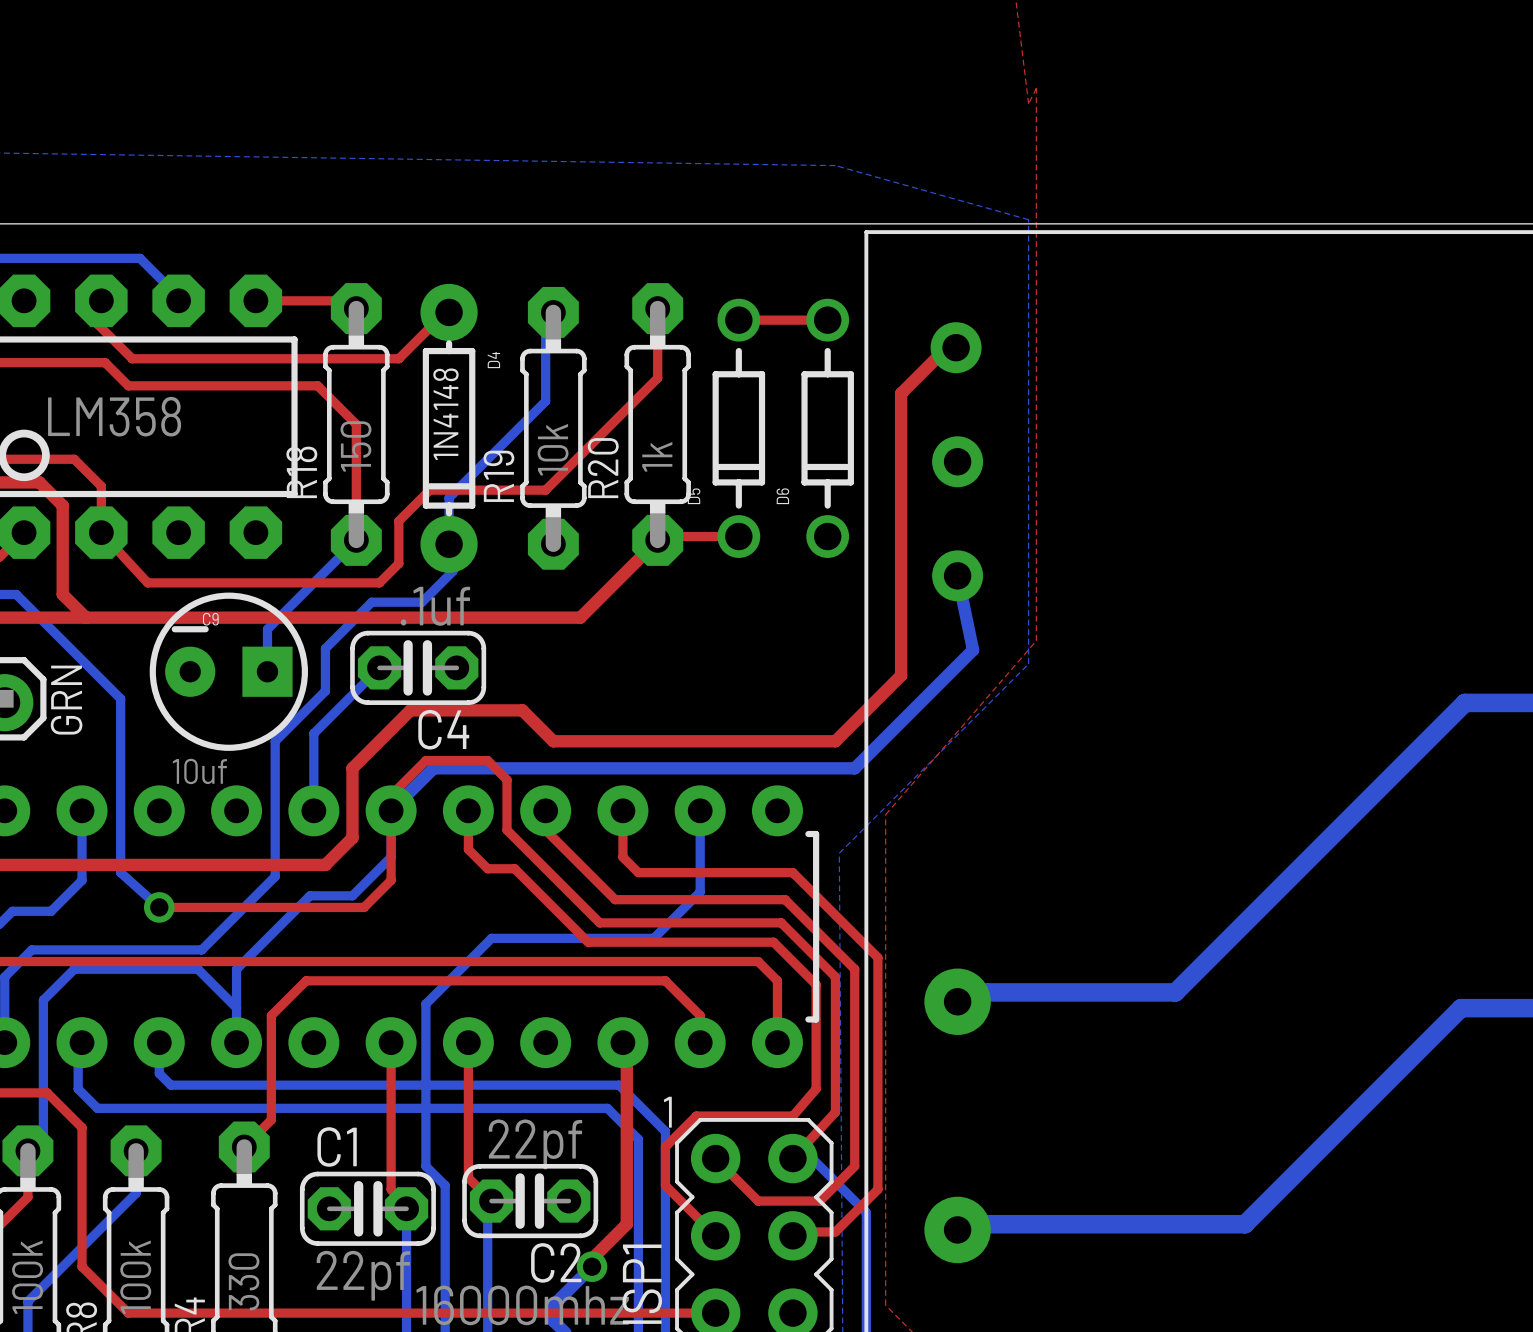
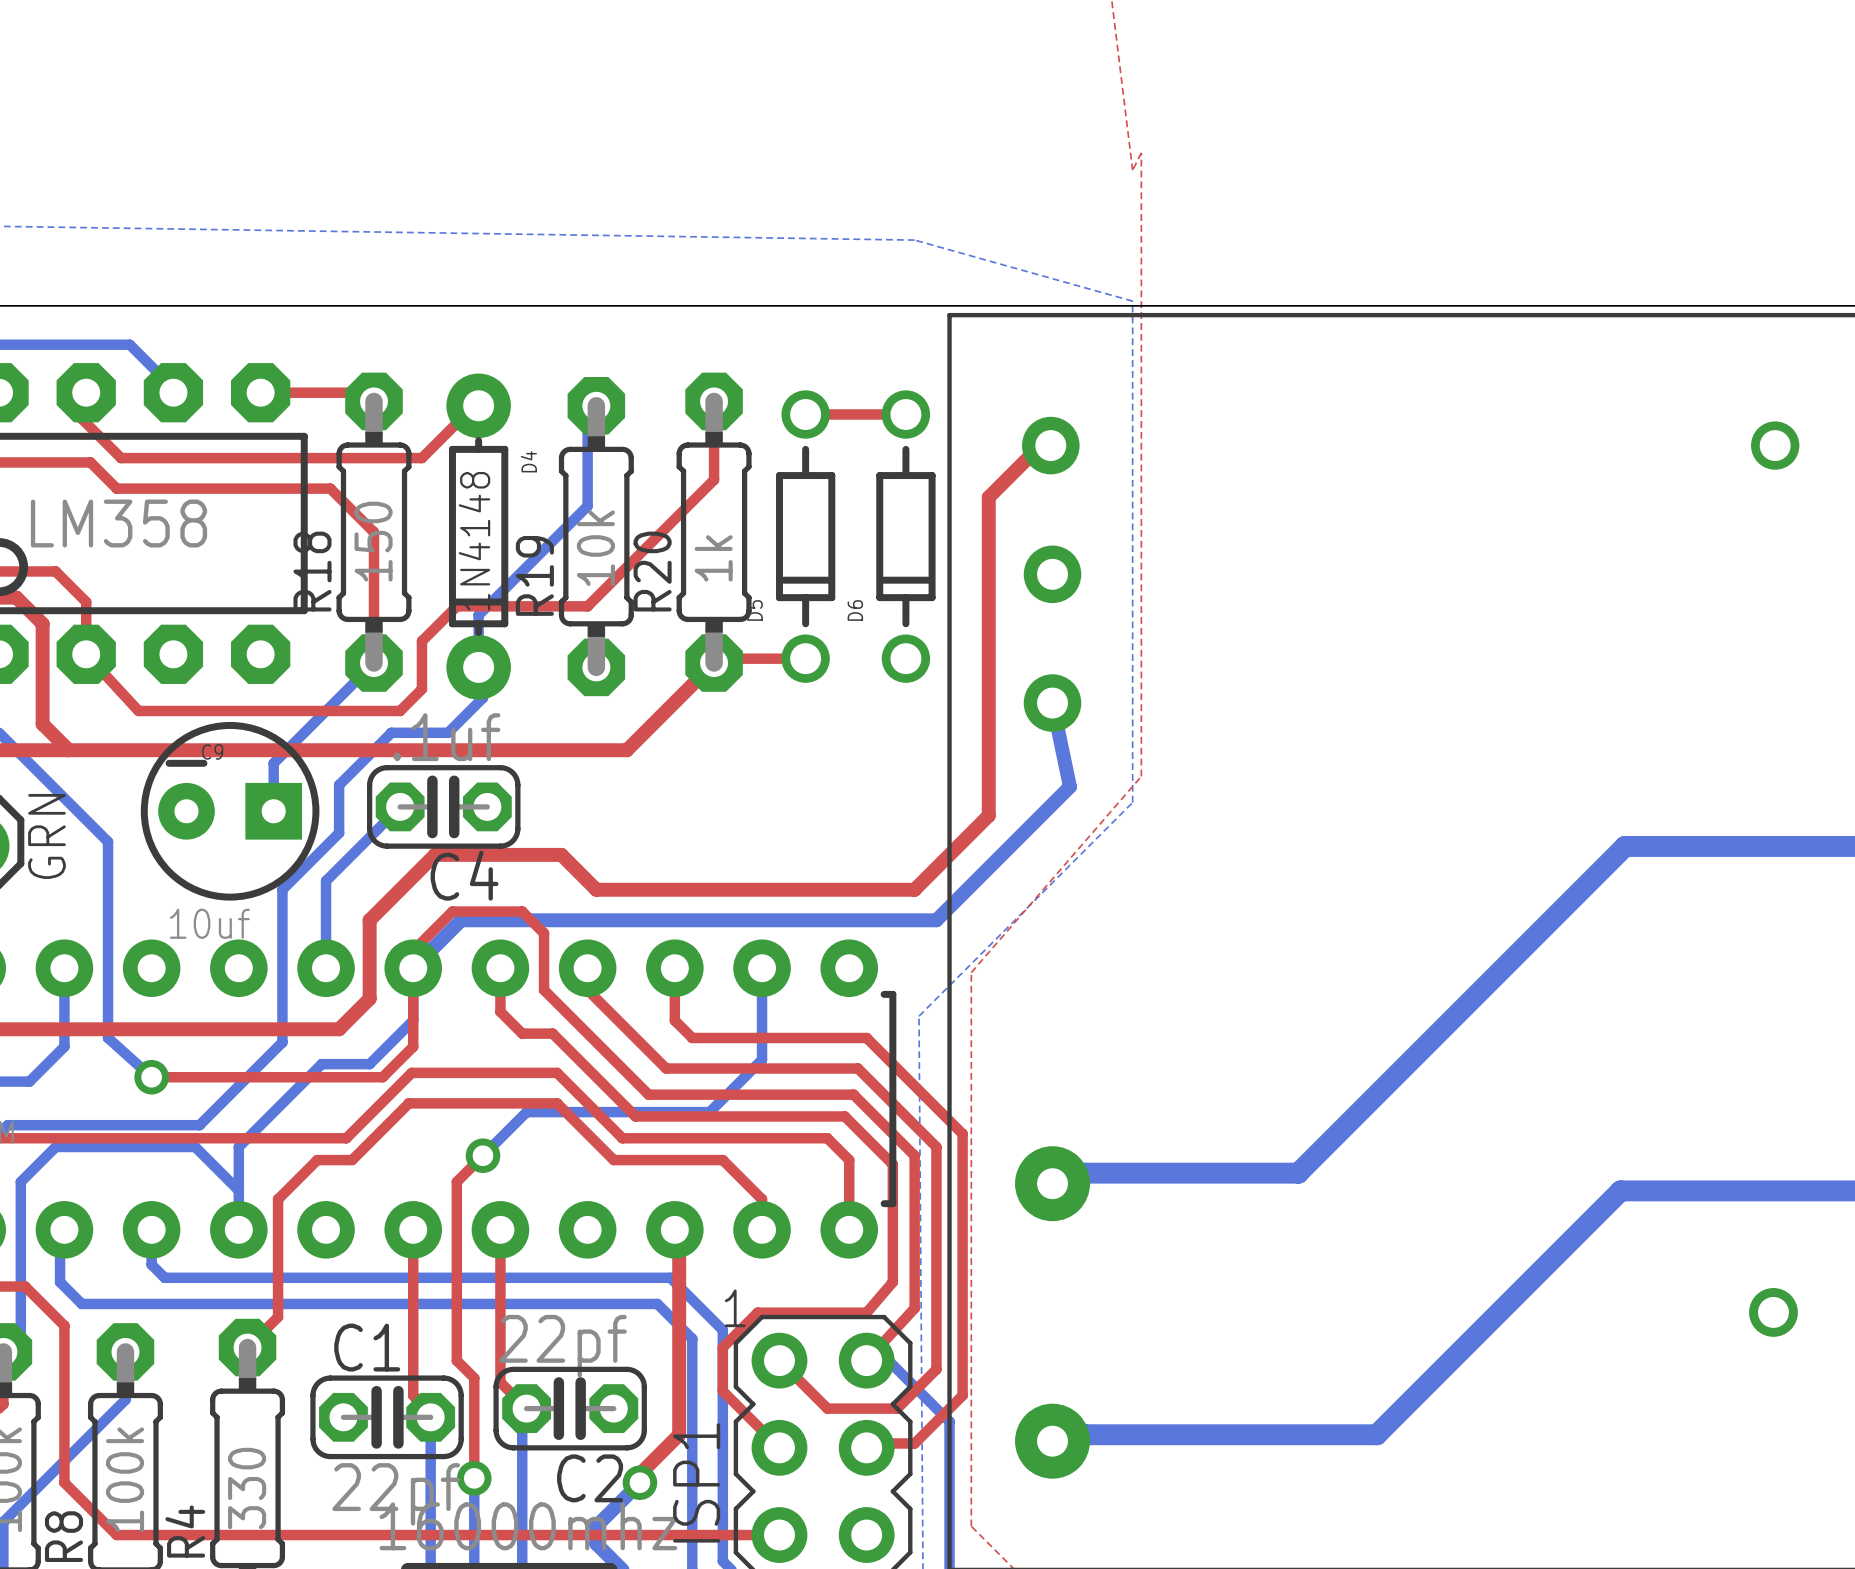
top track: (331, 961) (576, 961) -> (346, 1138) (411, 1072) (557, 1072) (622, 1138)
top track: none -> (482, 1155) (456, 1181) (456, 1360) (474, 1378) (474, 1478)
bottom track: (452, 976) (425, 1004) (425, 1166) (445, 1185) (445, 1262) -> none
via: none -> (482, 1155)
top track: (337, 980) (568, 980) -> (352, 1160) (408, 1103) (557, 1103) (613, 1160)
via: none -> (474, 1478)

